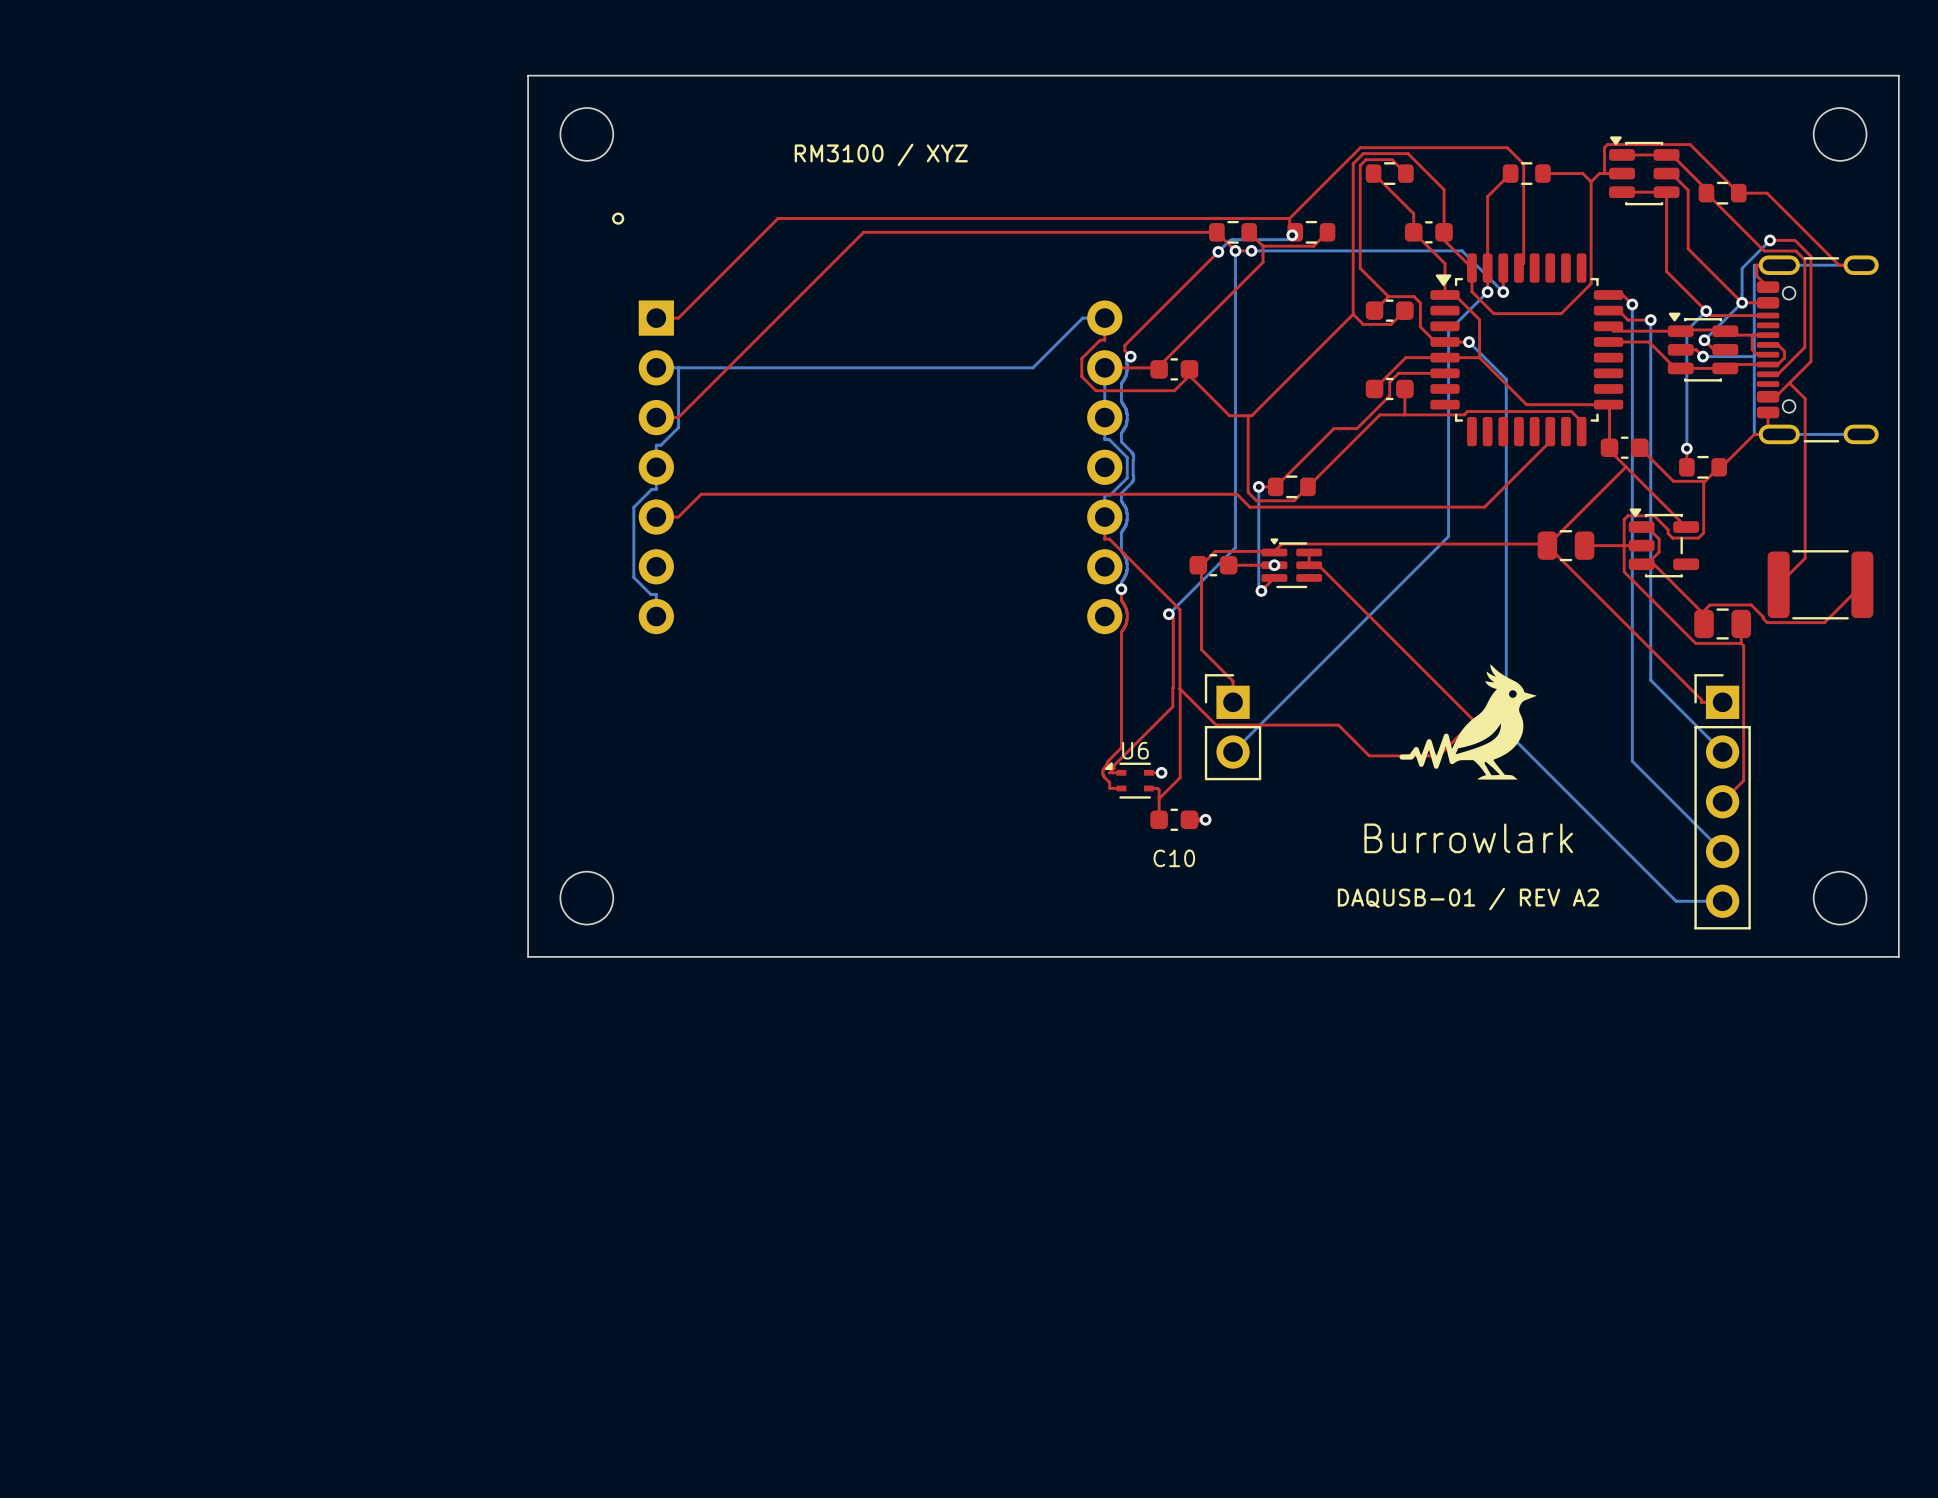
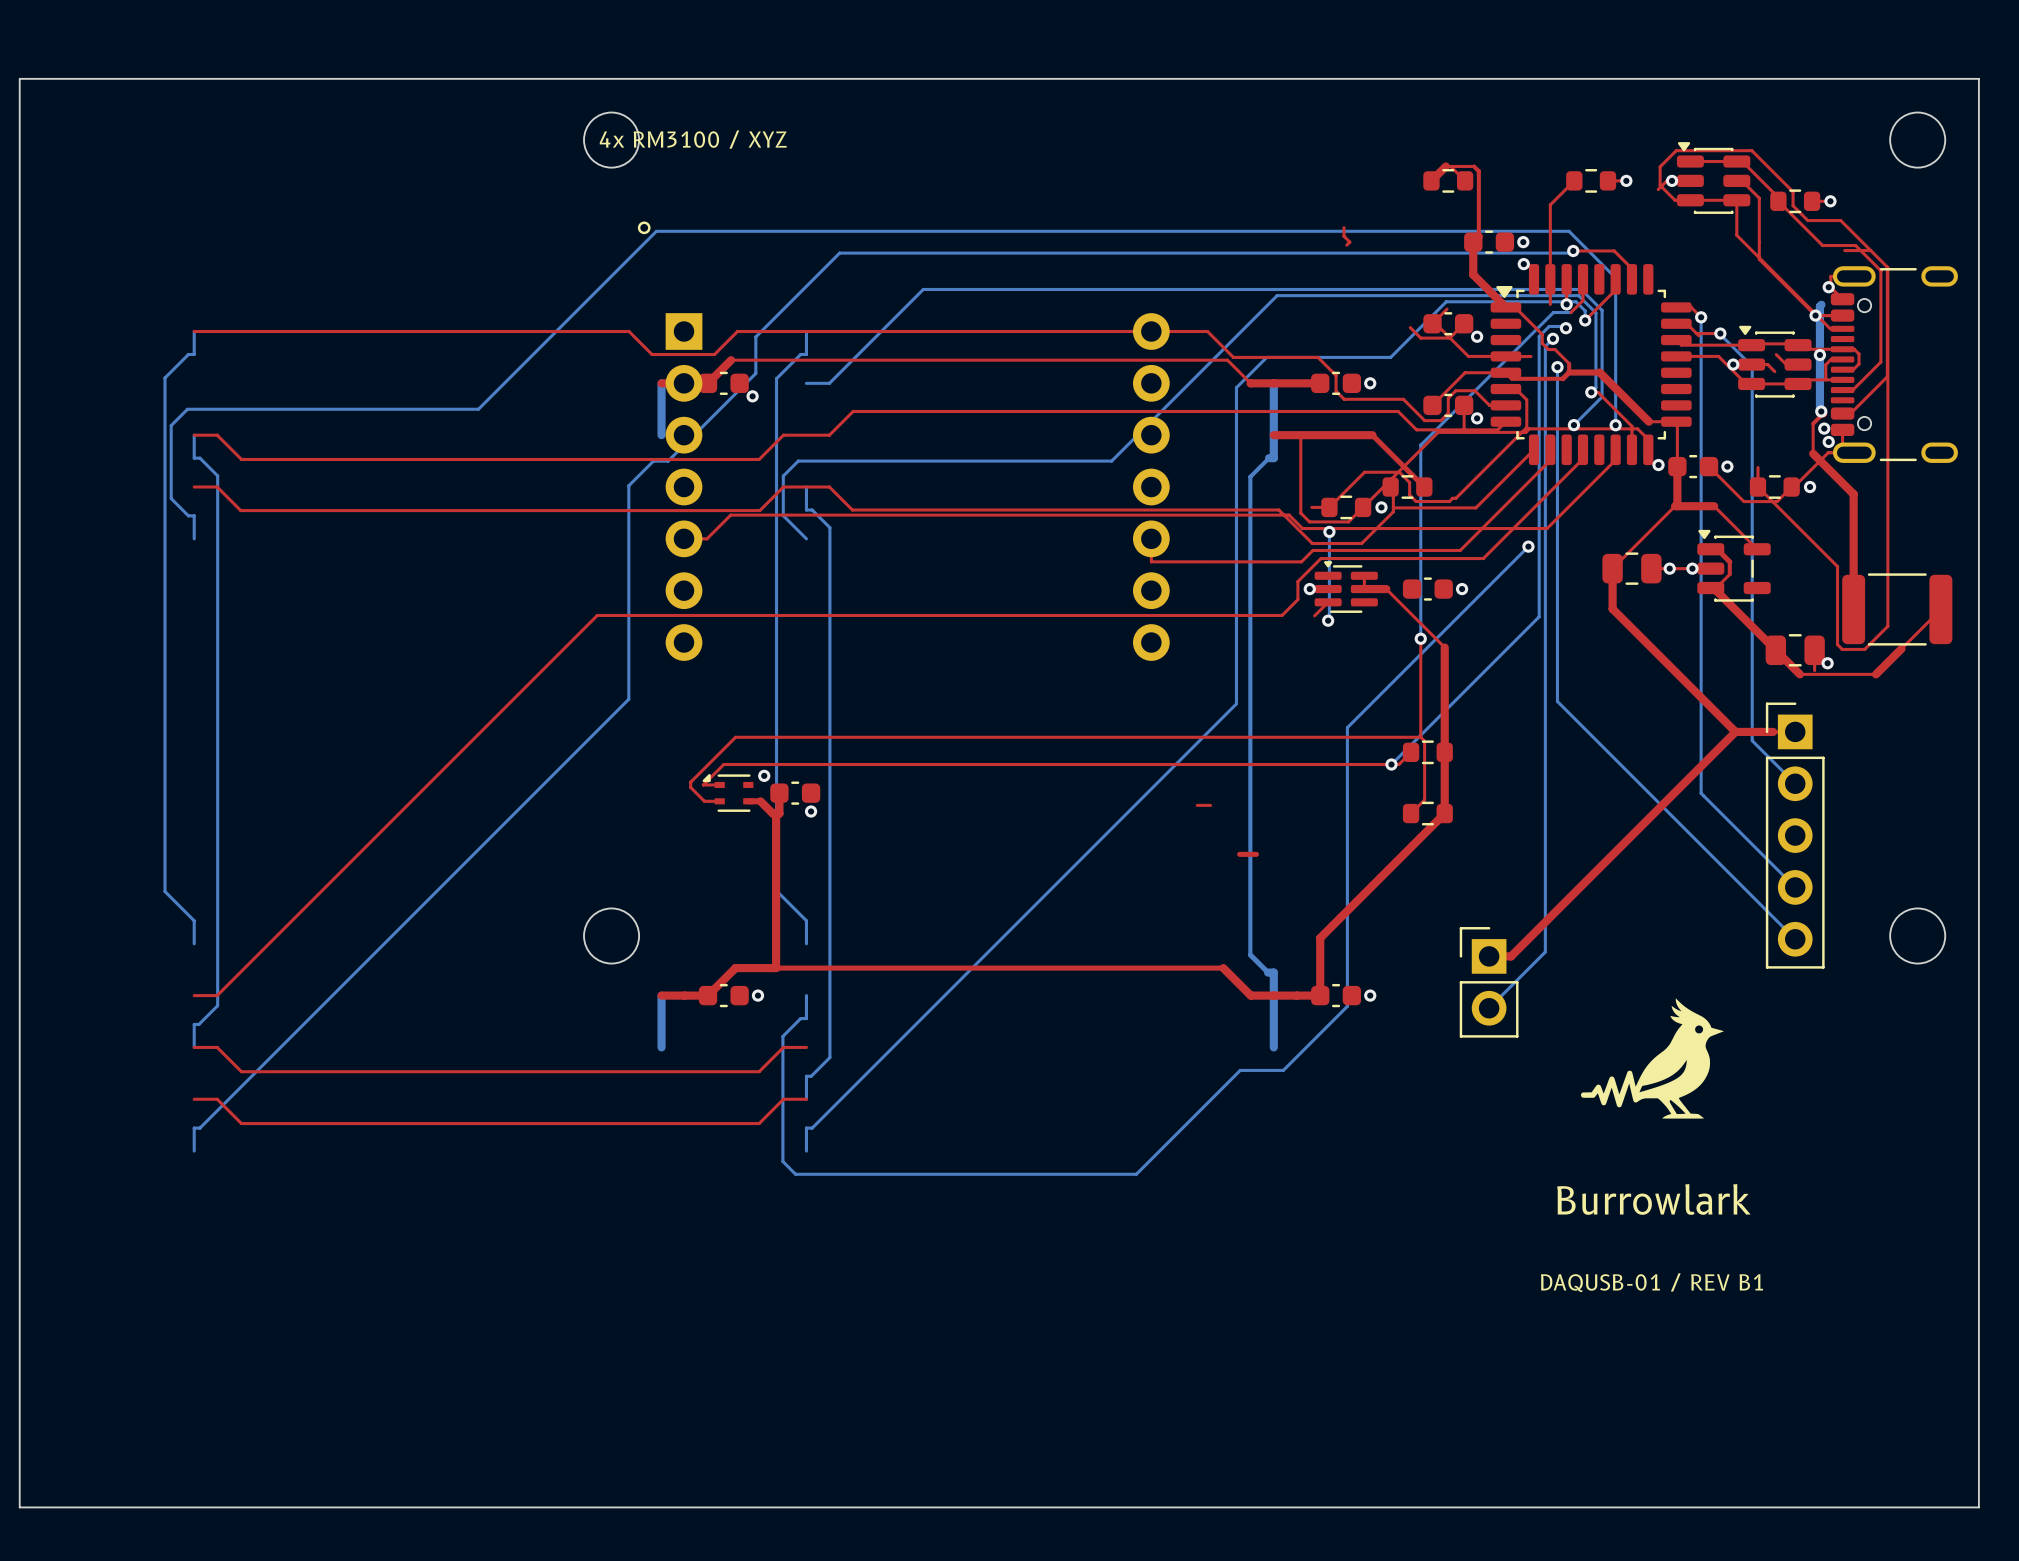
board edge: (528, 75) (528, 956) (1898, 956) -> (550, 78) (19, 78) (19, 1507) (1978, 1507) (1978, 997)
top track: (1608, 144) (1604, 147) (1604, 173) -> (1676, 150) (1660, 166) (1660, 185) (1675, 200) (1690, 200)
top track: (1681, 144) (1690, 144) (1738, 193) -> (1751, 150) (1793, 191) (1793, 205) (1807, 220) (1840, 220) (1870, 250)
text: RM3100 / XYZ (881, 154) -> 4x RM3100 / XYZ (693, 139)
top track: (1387, 159) (1366, 159) (1360, 165) (1360, 268) (1388, 296) (1414, 296) (1420, 302) (1420, 326) (1435, 341) -> (1435, 323) (1468, 356) (1495, 356)
top track: none -> (1445, 166) (1431, 180)
top track: (1373, 173) (1413, 213) (1413, 232) (1445, 263) (1445, 294) -> (1450, 166) (1474, 166) (1478, 171) (1478, 236) (1473, 242) (1473, 274) (1505, 307)
top track: (1560, 173) (1582, 173) (1591, 181) (1591, 283) (1561, 313) (1493, 313) (1471, 291) (1471, 268) (1444, 240) (1444, 189) (1408, 153) (1363, 153) (1353, 163) (1353, 314) (1251, 415) (1229, 415) (1189, 375) -> none
via: none -> (1626, 180)
via: none -> (1672, 180)
top track: (1756, 193) (1767, 193) (1839, 265) (1861, 265) -> none
via: none -> (1830, 201)
top track: (1666, 225) (1666, 271) (1710, 315) (1756, 315) -> (1736, 235) (1830, 328)
part: (1233, 232) -> none
top track: (1249, 232) (1263, 246) -> none
part: (1311, 232) -> none
top track: (1327, 232) (1313, 246) (1263, 246) -> none
via: none -> (1523, 242)
bottom track: (1292, 235) (1287, 239) (1232, 239) (1218, 251) -> none
via: (1292, 235) -> none
top track: (1748, 235) (1764, 250) (1795, 250) -> (1822, 245) (1855, 245) (1871, 261)
top track: none -> (1573, 250) (1614, 250) (1631, 268) (1631, 279)
bottom track: none -> (1573, 250) (1571, 253) (839, 253) (755, 336) (755, 373) (668, 461) (653, 461) (628, 485) (628, 699) (199, 1128) (194, 1128) (194, 1151)
via: none -> (1573, 250)
bottom track: (1770, 240) (1742, 268) (1742, 302) -> none
via: (1770, 240) -> none
top track: (1263, 246) (1263, 262) (1157, 367) -> none
bottom track: (1235, 250) (1235, 547) (1168, 614) -> none
via: (1235, 250) -> none
top track: (1251, 250) (1235, 250) (1216, 232) (863, 232) (678, 417) (656, 417) -> none
bottom track: (1251, 250) (1462, 250) (1503, 292) -> none
via: (1251, 250) -> none
top track: (1218, 251) (1124, 345) (1124, 350) (1130, 356) -> none
via: (1218, 251) -> none
via: none -> (1523, 264)
top track: none -> (1887, 267) (1887, 626) (1864, 649) (1841, 648)
bottom track: (1861, 265) (1754, 265) (1754, 434) (1861, 434) -> none
top track: none -> (1582, 279) (1582, 300) (1570, 312)
top track: none -> (1615, 279) (1615, 289) (1585, 320)
top track: (1521, 270) (1518, 268) (1523, 263) (1523, 164) (1507, 147) (1360, 147) (1289, 218) (778, 218) (678, 318) (656, 318) -> none
via: none -> (1828, 287)
bottom track: (1487, 292) (1448, 331) (1448, 536) (1233, 752) -> none
via: (1487, 292) -> none
bottom track: none -> (1821, 304) (1819, 306) (1821, 411)
top track: (1453, 294) (1479, 319) (1479, 357) -> (1515, 307) (1542, 334) (1542, 343) (1548, 349) (1555, 349) (1569, 363) (1569, 372)
bottom track: none -> (1570, 312) (1553, 312) (1420, 445) (1420, 638)
bottom track: (1741, 302) (1704, 340) -> none
bottom track: none -> (1585, 320) (1585, 310) (1576, 301) (1446, 301) (1390, 357) (1266, 357) (1236, 387) (1236, 703) (812, 1128) (806, 1128) (806, 1151)
via: none -> (1585, 320)
bottom track: (1706, 311) (1686, 330) (1686, 448) -> none
via: (1706, 311) -> none
bottom track: none -> (1565, 328) (1564, 326) (1549, 326) (1539, 336) (1539, 616) (1391, 764)
via: none -> (1565, 328)
top track: none -> (194, 331) (629, 331) (652, 354) (714, 354) (737, 331) (1207, 331) (1233, 357) (1317, 357) (1336, 375) (1336, 391) (1344, 399) (1403, 399) (1424, 420) (1440, 420) (1448, 412)
bottom track: none -> (194, 331) (194, 354) (188, 354) (165, 377) (165, 891) (194, 920) (194, 943)
bottom track: none -> (806, 331) (806, 354) (800, 354) (776, 378) (776, 890) (806, 920) (806, 943)
top track: (1104, 318) (1104, 340) (1100, 340) (1081, 358) (1081, 376) (1095, 390) (1174, 390) (1189, 375) -> none
bottom track: (1104, 318) (1082, 318) (1032, 367) (795, 367) -> (1573, 425) (1602, 396) (1602, 310) (1581, 289) (923, 289) (829, 383)
bottom track: (1650, 320) (1650, 680) (1681, 710) -> (1721, 335) (1752, 366) (1752, 740)
via: none -> (1477, 336)
bottom track: none -> (1552, 338) (1545, 346) (1545, 952) (1489, 1008)
via: none -> (1552, 338)
top track: (1752, 335) (1752, 349) (1757, 354) (1768, 354) -> (1842, 349) (1854, 349) (1858, 354) (1858, 363) (1853, 369) (1842, 369)
via: (1704, 340) -> none
via: none -> (1819, 355)
bottom track: (1469, 342) (1506, 379) (1506, 731) (1676, 901) (1722, 901) -> (1557, 367) (1557, 701) (1795, 939)
via: (1469, 342) -> none
top track: (1768, 344) (1778, 344) (1784, 351) (1784, 357) (1777, 364) (1768, 364) -> (1842, 359) (1831, 359) (1825, 364) (1825, 379)
via: none -> (1733, 364)
via: none -> (1557, 367)
bottom track: (1130, 356) (1126, 361) (1126, 373) (1121, 383) (1121, 401) (1127, 414) (1126, 425) (1121, 433) (1121, 441) (1133, 455) (1133, 479) (1121, 493) (1121, 501) (1127, 513) (1126, 524) (1121, 532) (1121, 551) (1127, 563) (1126, 572) (1121, 582) (1121, 589) -> none
via: (1130, 356) -> none
bottom track: (1702, 356) (1754, 356) -> none
via: (1702, 356) -> none
top track: (1445, 357) (1479, 357) -> (1505, 372) (1512, 378) (1562, 378) (1569, 372)
top track: (1479, 357) (1526, 404) (1582, 404) -> (1569, 372) (1599, 372) (1648, 421)
top track: none -> (661, 383) (707, 383) (731, 360) (1227, 360) (1250, 383) (1320, 383)
bottom track: none -> (661, 383) (661, 435)
bottom track: (656, 367) (773, 367) -> none
bottom track: (678, 367) (678, 427) (660, 445) (656, 445) (656, 489) (651, 489) (633, 507) (633, 577) (650, 594) (656, 594) (656, 616) -> none
part: none -> (723, 383)
top track: (1104, 367) (1157, 367) -> none
bottom track: (1104, 367) (1104, 439) (1109, 439) (1127, 457) (1127, 477) (1110, 494) (1104, 494) (1104, 517) -> none
bottom track: none -> (1273, 383) (1273, 458) (1269, 458) (1250, 476) (1250, 954) (1268, 972) (1273, 972) (1273, 1047)
part: none -> (1336, 383)
via: none -> (1370, 383)
part: (1174, 369) -> none
top track: (1445, 373) (1398, 373) (1396, 374) -> (1505, 405) (1489, 405) (1474, 390) (1455, 390)
top track: none -> (1591, 392) (1598, 392) (1631, 426) (1631, 449)
bottom track: none -> (1591, 392) (1595, 387) (1595, 312) (1578, 295) (1277, 295) (1111, 461) (798, 461) (783, 476) (783, 515) (806, 538)
via: none -> (1591, 392)
via: none -> (752, 396)
top track: (1789, 383) (1805, 398) (1805, 558) (1778, 584) -> (1821, 411) (1823, 413) (1813, 423) (1813, 453) (1853, 494) (1853, 609)
via: none -> (1821, 411)
top track: (1389, 395) (1357, 428) (1333, 428) (1309, 453) -> (1505, 389) (1515, 389) (1526, 399) (1526, 427) (1455, 498) (1449, 501) (1416, 501) (1409, 495) (1409, 482) (1399, 472) (1364, 472)
via: none -> (1477, 418)
top track: none -> (1505, 421) (1497, 429) (1416, 429) (1398, 411) (853, 411) (829, 435) (783, 435) (759, 459) (241, 459) (217, 435) (194, 435)
via: none -> (1573, 425)
bottom track: none -> (1615, 425) (1615, 277) (1569, 231) (656, 231) (478, 409) (187, 409) (171, 425) (171, 498) (188, 515) (194, 515) (194, 538)
via: none -> (1615, 425)
via: none -> (1824, 428)
bottom track: none -> (194, 435) (194, 458) (199, 458) (217, 475) (217, 1005) (198, 1024) (194, 1024) (194, 1047)
top track: none -> (1273, 435) (1372, 435) (1424, 487)
via: none -> (1828, 441)
top track: none -> (1534, 449) (1475, 507) (1393, 507)
top track: none -> (1582, 449) (1582, 458) (1483, 558) (1320, 558) (1297, 581) (1297, 599) (1282, 615) (597, 615) (217, 995) (194, 995)
via: none -> (1658, 465)
via: none -> (1727, 466)
via: (1686, 448) -> none
top track: (1609, 450) (1626, 466) -> (1677, 469) (1677, 506)
top track: (1626, 466) (1607, 485) -> (1714, 506) (1675, 506)
top track: (1626, 466) (1644, 485) -> none
top track: none -> (194, 487) (217, 487) (240, 510) (759, 510) (783, 487) (829, 487) (852, 510) (1278, 510) (1312, 543) (1361, 543) (1393, 511) (1393, 489) (1390, 487)
bottom track: none -> (806, 487) (806, 510) (812, 510) (829, 527) (829, 1057) (811, 1076) (806, 1076) (806, 1099)
part: none -> (1407, 487)
via: none -> (1810, 487)
top track: (1703, 481) (1703, 532) (1698, 538) (1672, 538) (1668, 533) (1668, 529) (1654, 515) (1627, 515) (1624, 519) (1624, 571) (1695, 643) (1741, 643) (1743, 645) (1743, 780) (1722, 801) -> none
bottom track: (1258, 486) (1258, 588) (1261, 590) -> none
via: (1258, 486) -> none
via: none -> (1381, 507)
bottom track: none -> (1329, 531) (1328, 620)
via: none -> (1329, 531)
bottom track: none -> (1528, 546) (1347, 727) (1347, 1006) (1283, 1070) (1240, 1070) (1136, 1174) (795, 1174) (782, 1161) (782, 1036) (800, 1018) (806, 1018) (806, 995)
via: none -> (1528, 546)
top track: (1647, 527) (1659, 539) (1659, 552) (1646, 564) -> (1716, 549) (1729, 561) (1729, 574) (1716, 588) (1716, 590) (1774, 648)
top track: (1104, 539) (1109, 539) (1179, 609) (1179, 688) (1216, 725) (1338, 725) (1369, 755) (1438, 755) (1472, 721) (1472, 719) (1318, 565) -> (1151, 561) (1301, 561) (1312, 550) (1460, 550) (1550, 460) (1550, 449)
top track: none -> (1612, 568) (1612, 608) (1735, 731)
via: none -> (1669, 568)
via: none -> (1692, 568)
top track: (1650, 560) (1702, 612) -> none
top track: (1201, 565) (1215, 551) (1274, 551) (1281, 544) (1545, 544) (1701, 699) (1701, 702) -> (1735, 731) (1773, 731)
top track: (1201, 565) (1201, 649) (1233, 681) (1233, 702) -> none
part: (1213, 565) -> none
top track: (1228, 565) (1256, 565) -> none
via: none -> (1309, 589)
via: (1274, 565) -> none
top track: none -> (1374, 589) (1386, 589) (1444, 647) (1444, 813) (1320, 938) (1320, 995) (1250, 995) (1223, 968) (776, 968)
part: none -> (1427, 589)
via: none -> (1462, 589)
top track: (1121, 589) (1121, 600) (1127, 613) (1126, 623) (1121, 631) (1121, 747) (1108, 760) (1102, 770) (1103, 775) (1109, 782) (1109, 788) (1121, 788) -> none
via: (1121, 589) -> none
via: (1261, 590) -> none
via: none -> (1328, 620)
top track: none -> (1420, 638) (1420, 737)
via: none -> (1420, 638)
top track: (1702, 612) (1709, 604) (1751, 604) (1763, 616) -> (1757, 487) (1837, 566) (1837, 642)
top track: (1168, 614) (1173, 618) (1172, 706) (1114, 765) (1114, 768) (1109, 772) (1121, 772) -> none
via: (1168, 614) -> none
top track: (1767, 622) (1824, 622) -> (1775, 650) (1799, 674) (1875, 674) (1901, 648)
via: none -> (1827, 663)
top track: (1180, 689) (1180, 777) (1159, 798) -> none
top track: none -> (1735, 731) (1511, 956) (1489, 956)
top track: none -> (1420, 737) (735, 737) (690, 782) (690, 787) (704, 801) (719, 801)
top track: none -> (1420, 737) (1424, 741) (1424, 799) (1411, 813)
top track: none -> (1411, 752) (1398, 764) (723, 764) (703, 784) (719, 784)
part: none -> (1427, 752)
drawing position: (1468, 721) -> (1652, 1058)
part position: (1233, 727) -> (1489, 982)
via: none -> (1391, 764)
via: none -> (764, 775)
part: none -> (727, 792)
top track: none -> (779, 793) (779, 813) (772, 813) (760, 801) (748, 801)
part: none -> (795, 793)
via: (1161, 772) -> none
via: none -> (811, 811)
top track: none -> (776, 813) (776, 968)
U6: (1129, 780) -> none
part: none -> (1427, 813)
top track: (1148, 788) (1159, 789) (1159, 819) -> none
C10: (1174, 819) -> none
via: (1205, 819) -> none
text position: Burrowlark (1468, 838) -> Burrowlark (1653, 1199)
text: DAQUSB-01 / REV A2 (1468, 899) -> none
top track: none -> (776, 968) (735, 968) (707, 995) (661, 995)
bottom track: none -> (661, 995) (661, 1047)
part: none -> (723, 995)
via: none -> (757, 995)
part: none -> (1336, 995)
via: none -> (1370, 995)
top track: none -> (194, 1047) (217, 1047) (241, 1071) (759, 1071) (783, 1047) (806, 1047)
top track: none -> (194, 1099) (217, 1099) (241, 1123) (759, 1123) (783, 1099) (806, 1099)
text: none -> DAQUSB-01 / REV B1 (1651, 1282)

